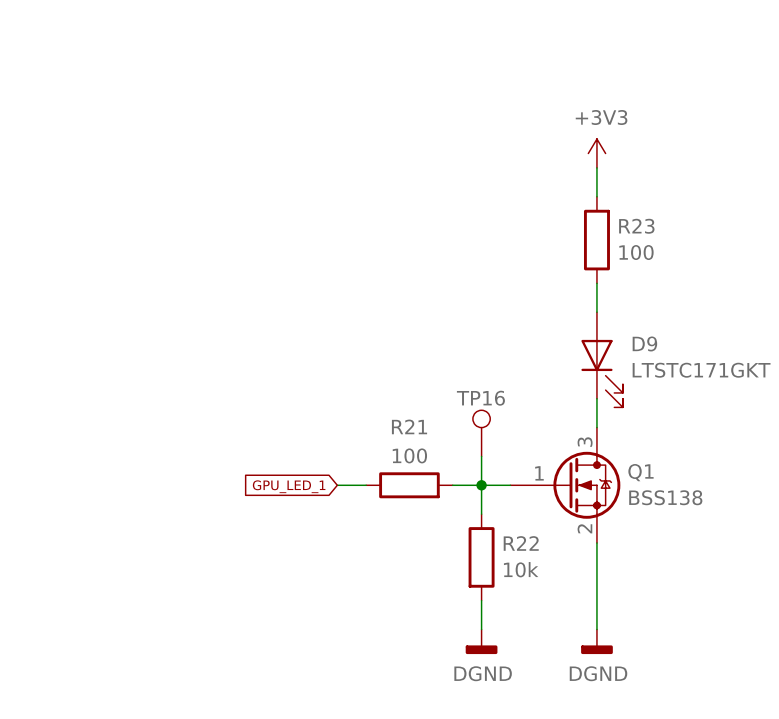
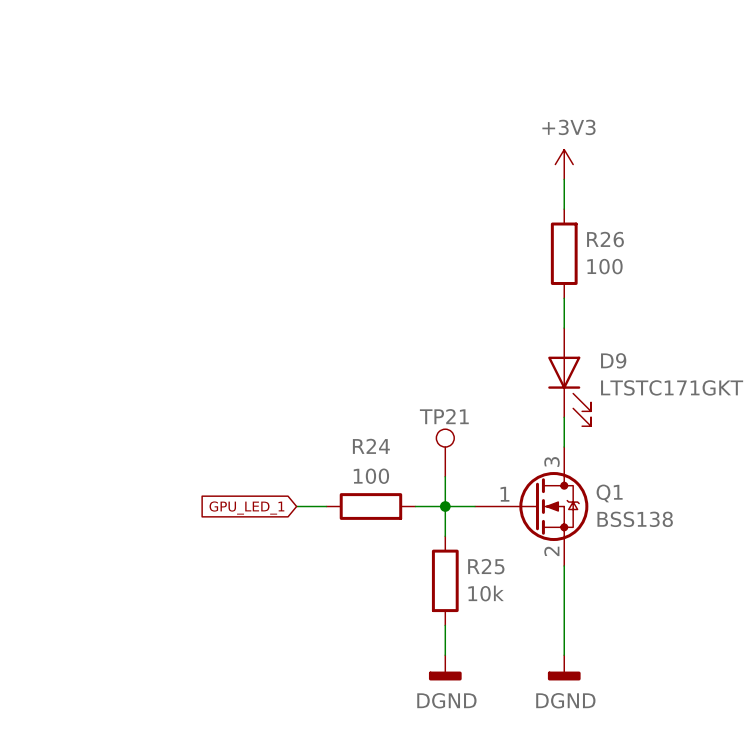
R23 name: R23 (636, 226) -> R26 (605, 239)
TP16 name: TP16 (480, 398) -> TP21 (444, 416)
R21 name: R21 (409, 426) -> R24 (371, 446)
R22 name: R22 (521, 543) -> R25 (486, 566)

